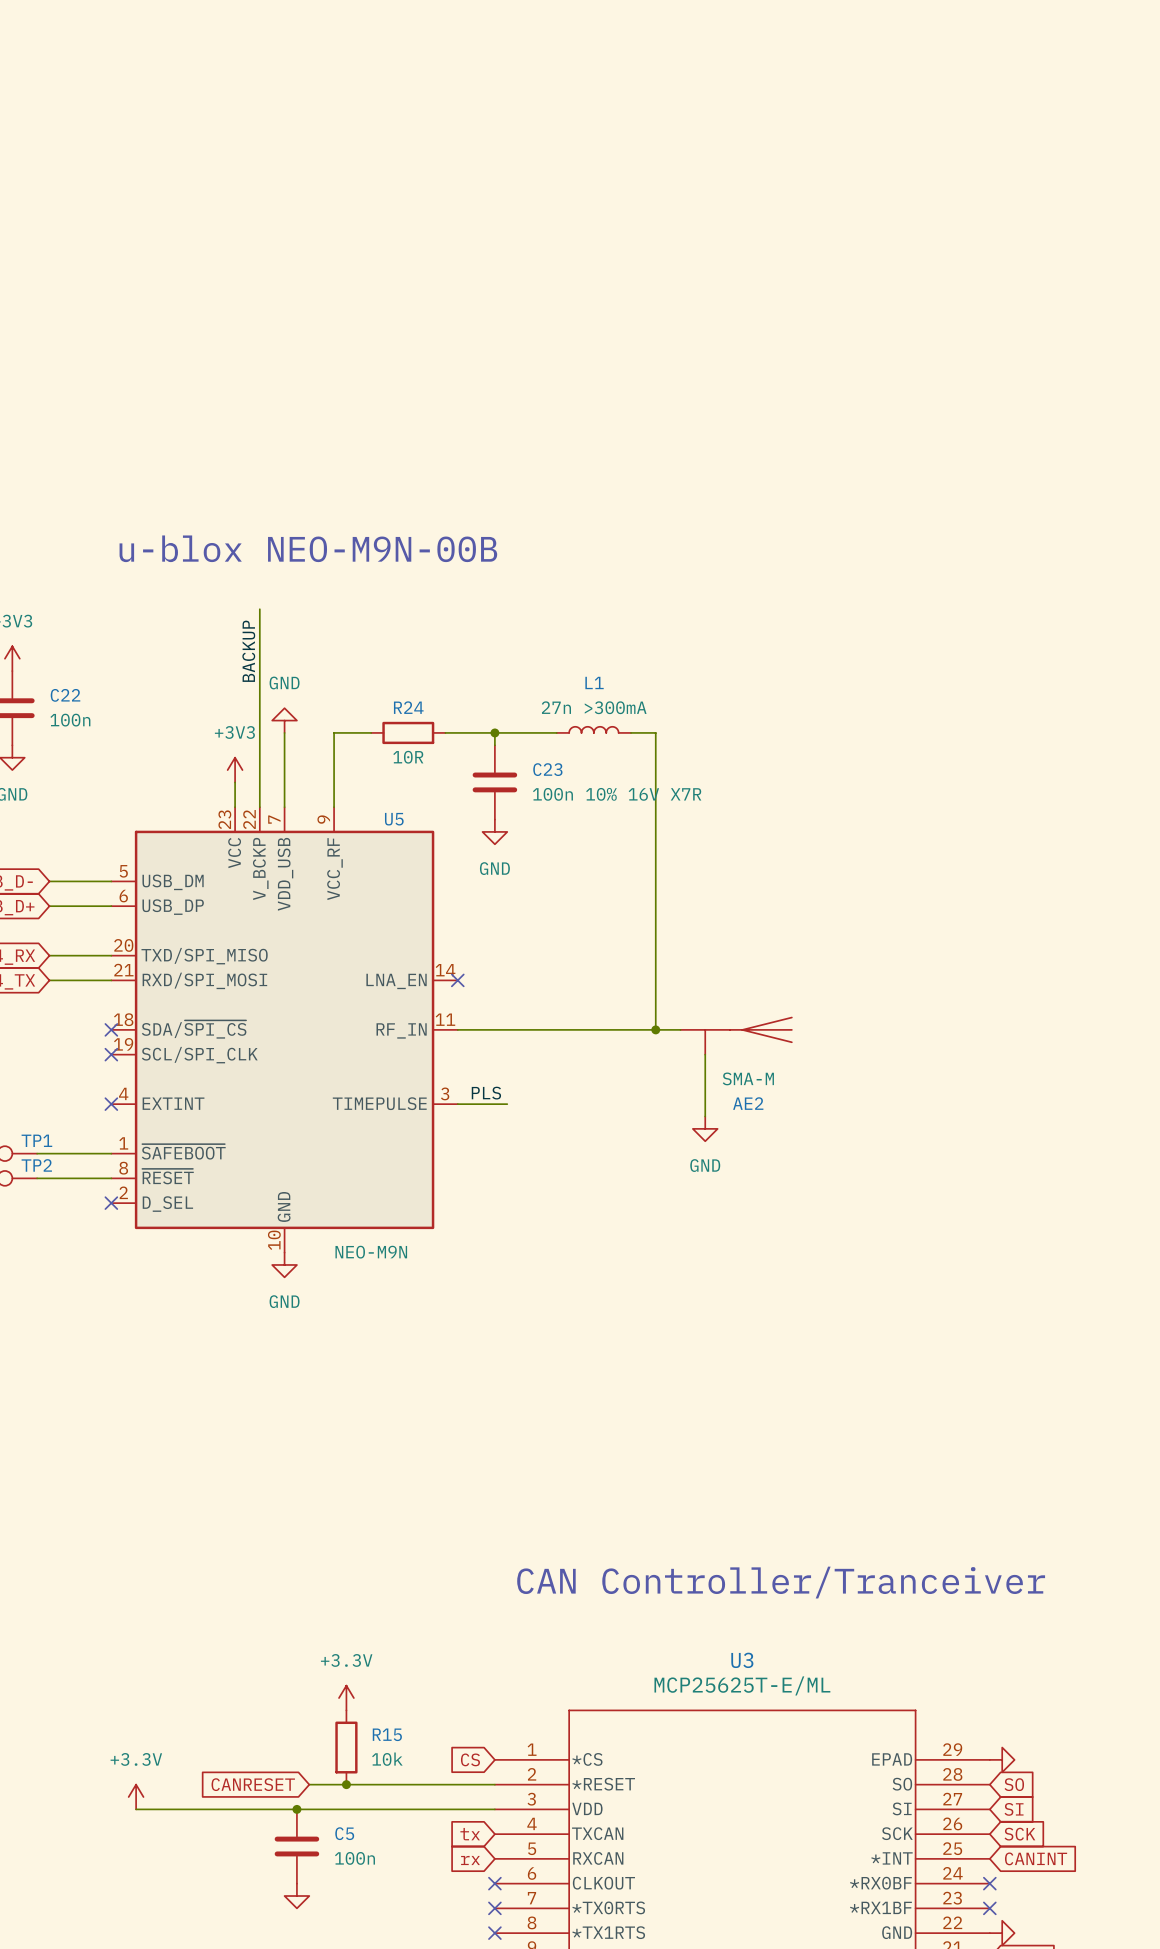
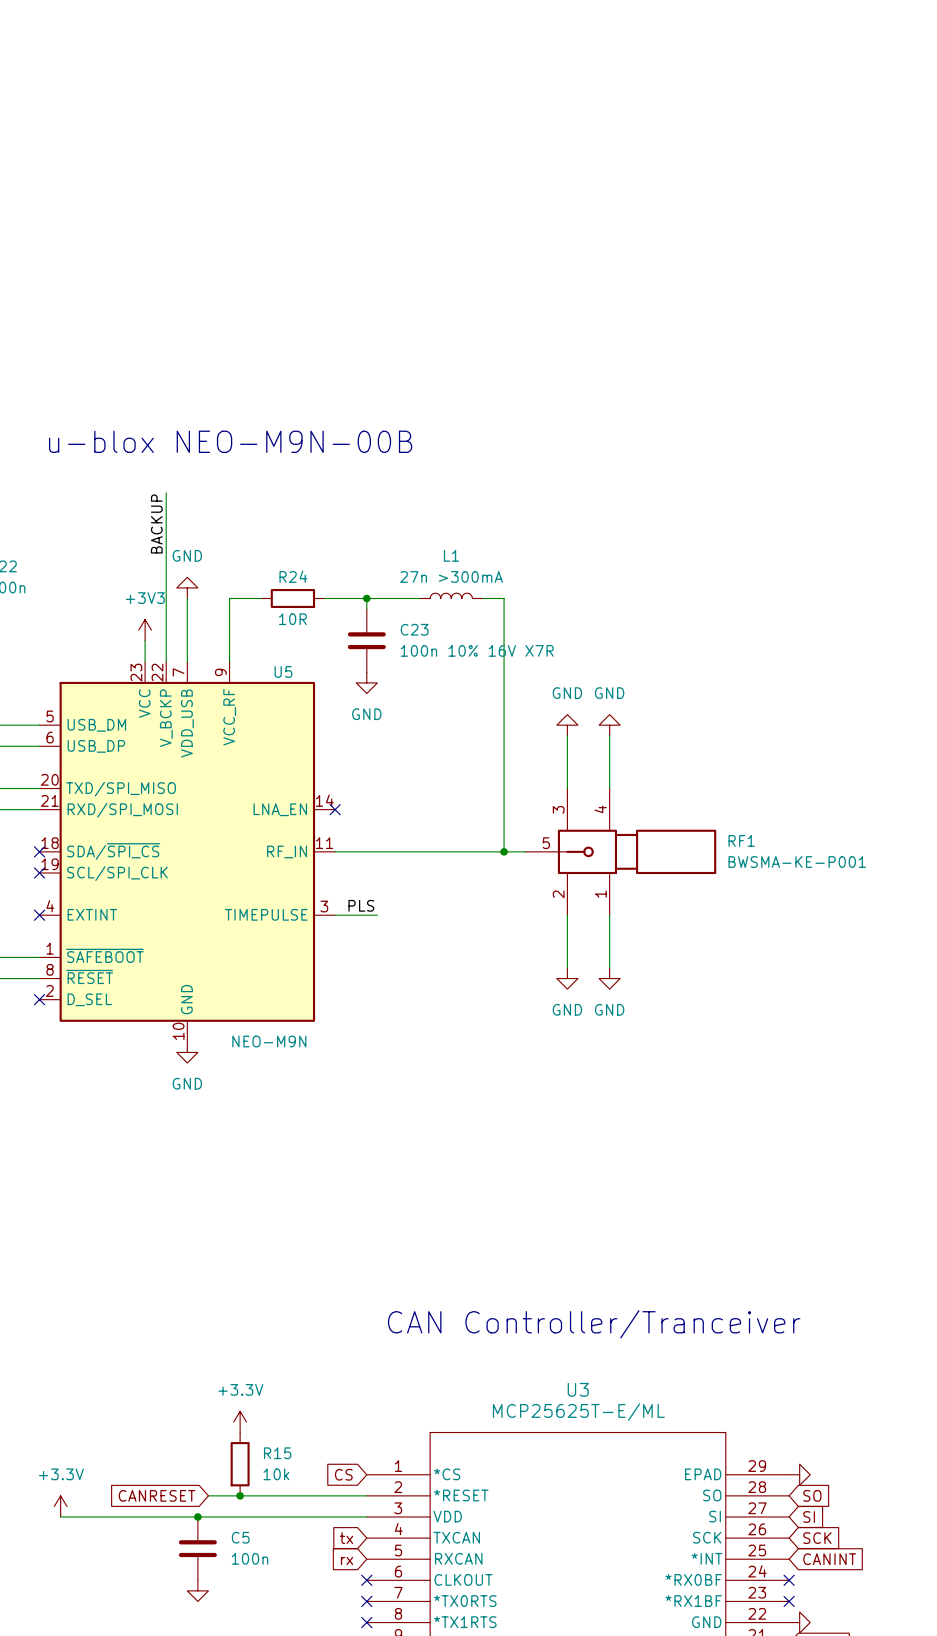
power symbol: none -> GND (567, 725)
power symbol: none -> GND (609, 725)
wire: none -> (567, 735) (567, 788)
wire: none -> (609, 735) (609, 788)
RF1: none -> BWSMA-KE-P001 (620, 851)
AE2: SMA-M (736, 1035) -> none
wire: (705, 1054) (705, 1116) -> (567, 915) (567, 968)
wire: none -> (609, 915) (609, 968)
power symbol: GND (705, 1128) -> none
power symbol: none -> GND (567, 978)
power symbol: none -> GND (609, 978)

